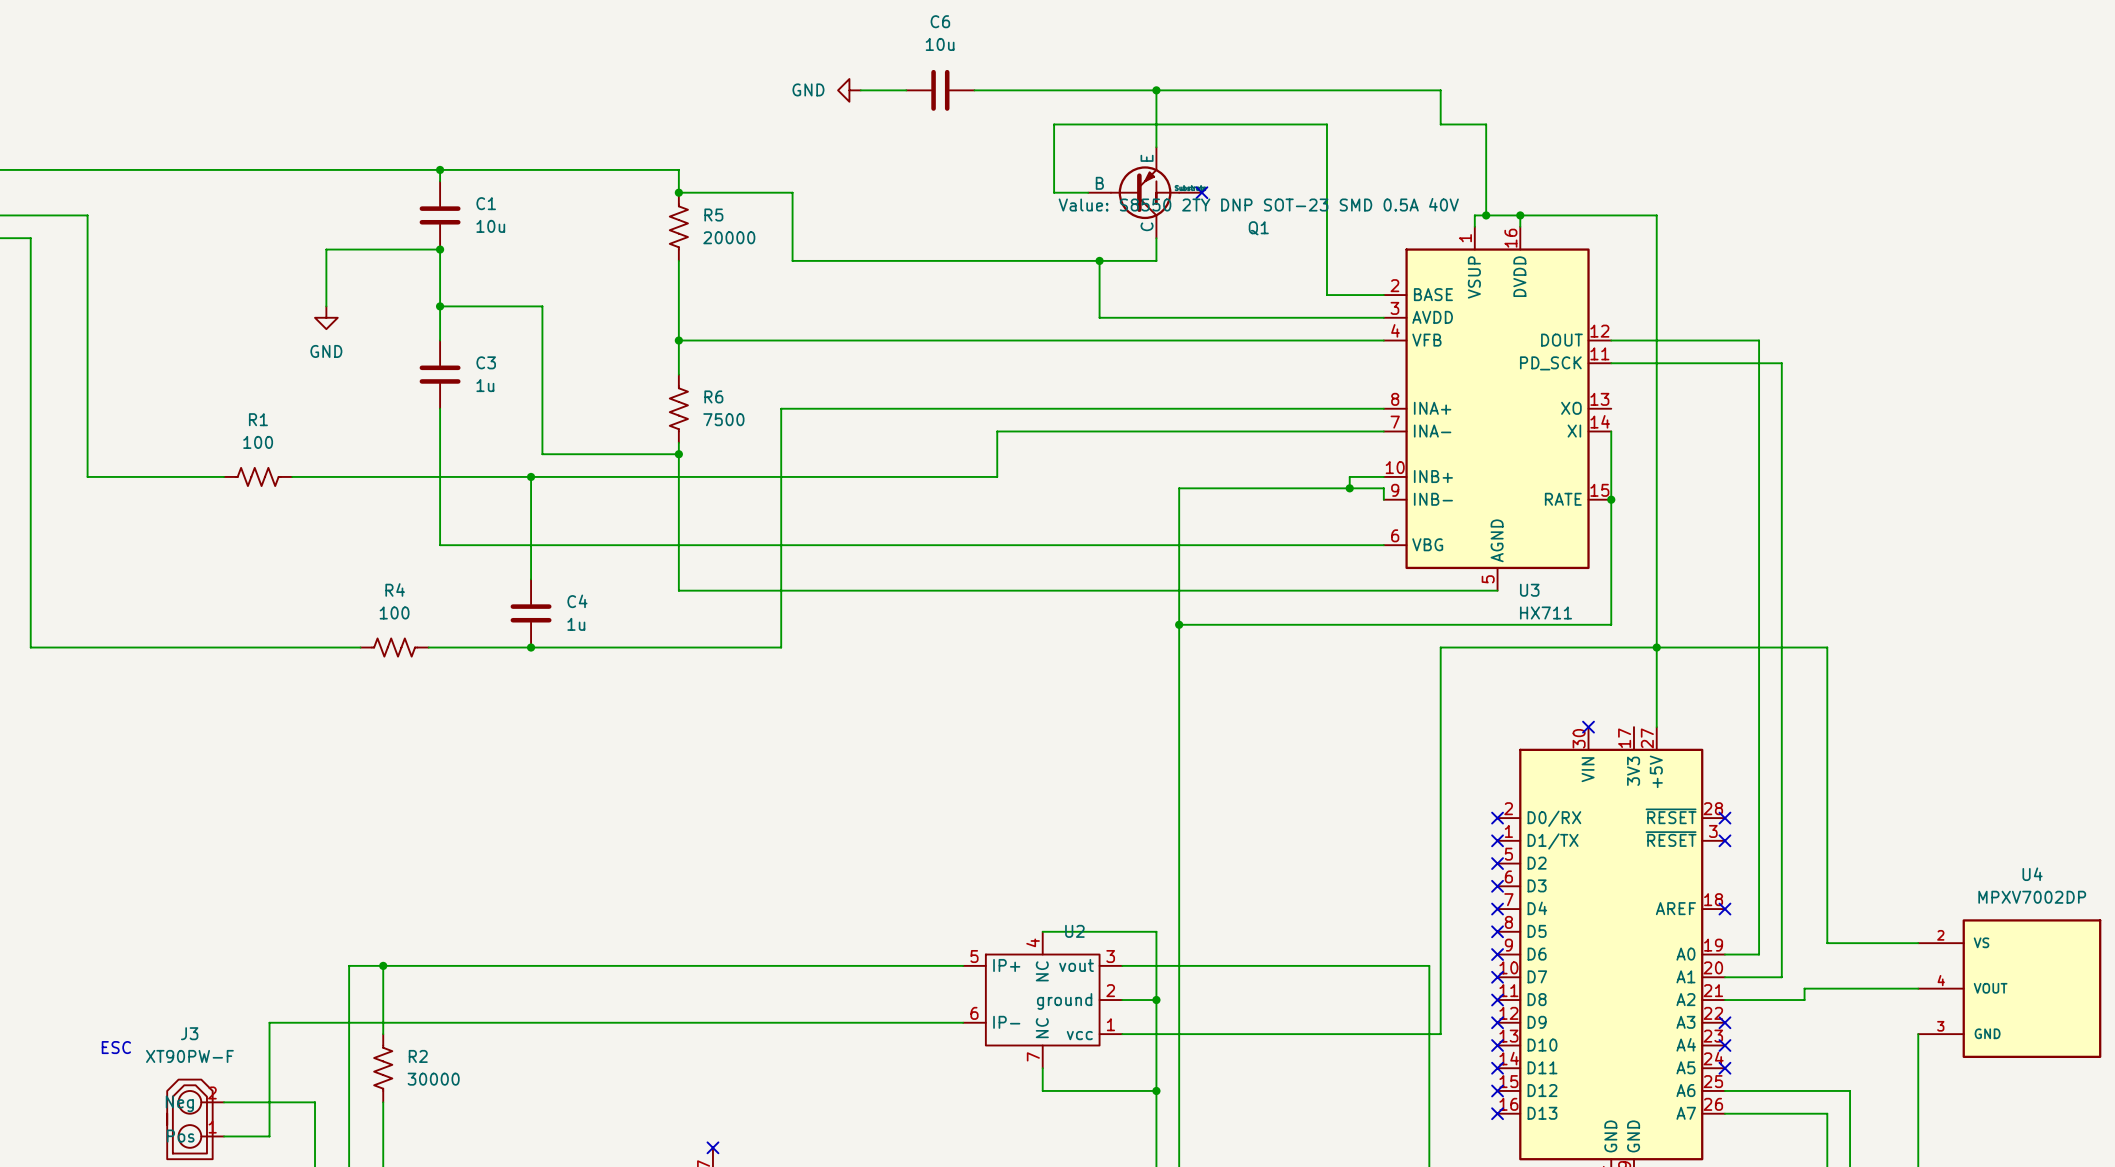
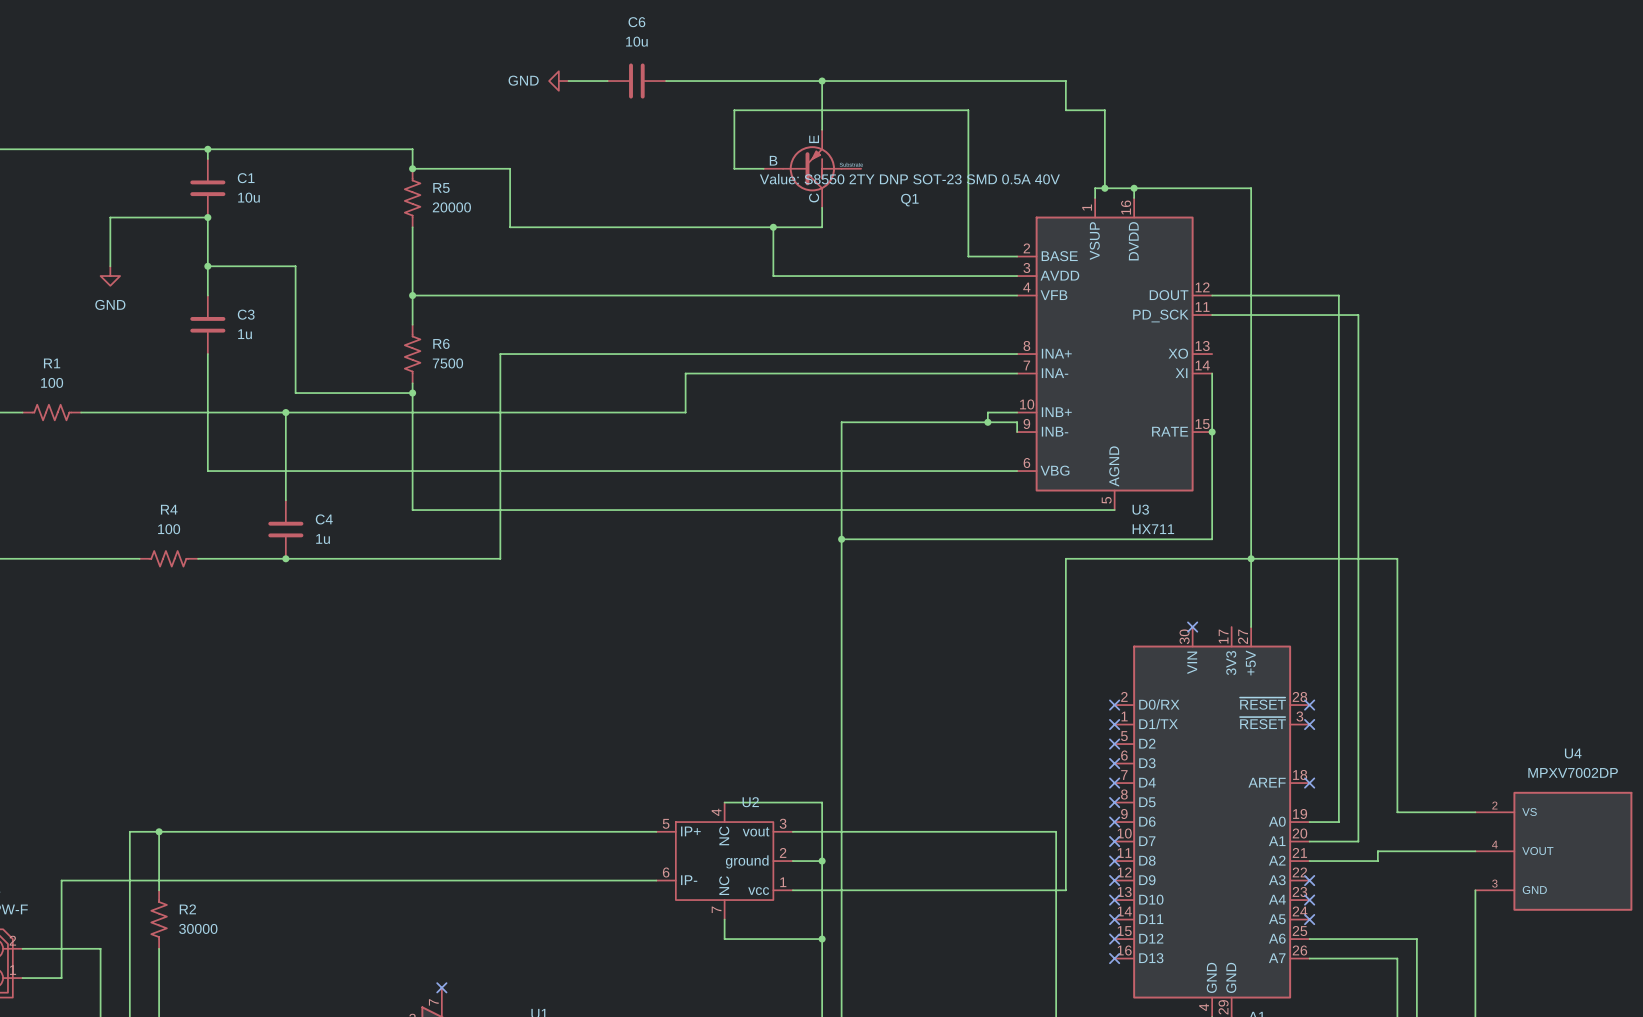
no-connect mark: (1201, 192) -> none

